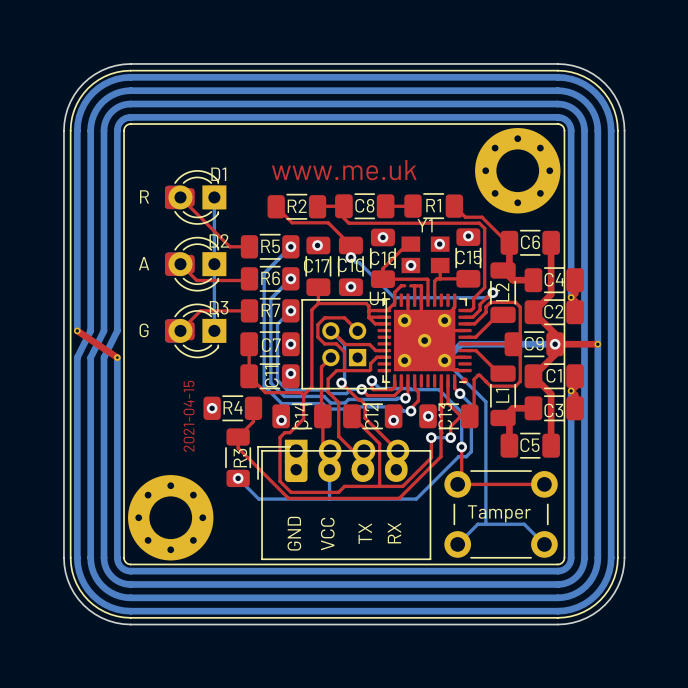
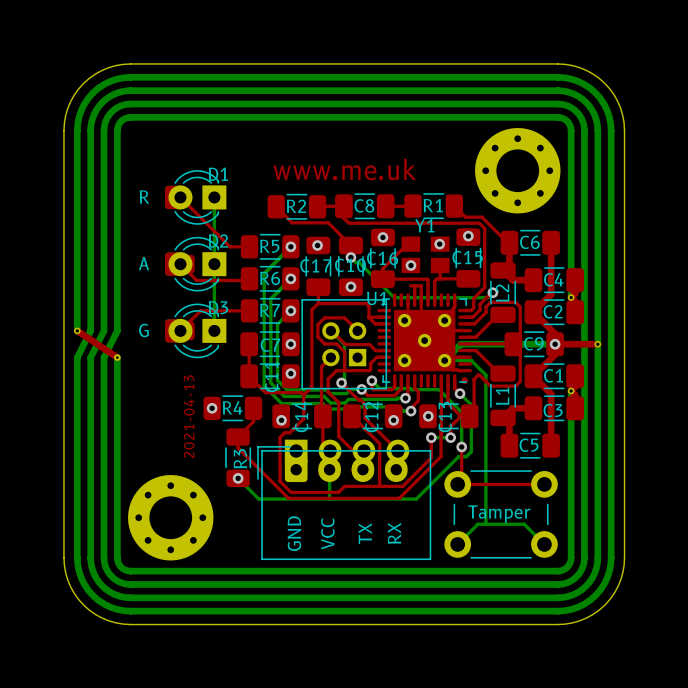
part footprint: [69, 69, 619, 619] -> [73, 73, 615, 615]
D1 footprint: [165, 170, 227, 225] -> [165, 170, 227, 225]
top track: (404, 285) (401, 285) (394, 292) (394, 303) (387, 310) (368, 311) -> none
bottom track: (444, 360) (485, 401) -> (444, 360) (471, 360) (485, 375) (485, 401)
text: 2021-04-15 (189, 416) -> 2021-04-13 (189, 416)

